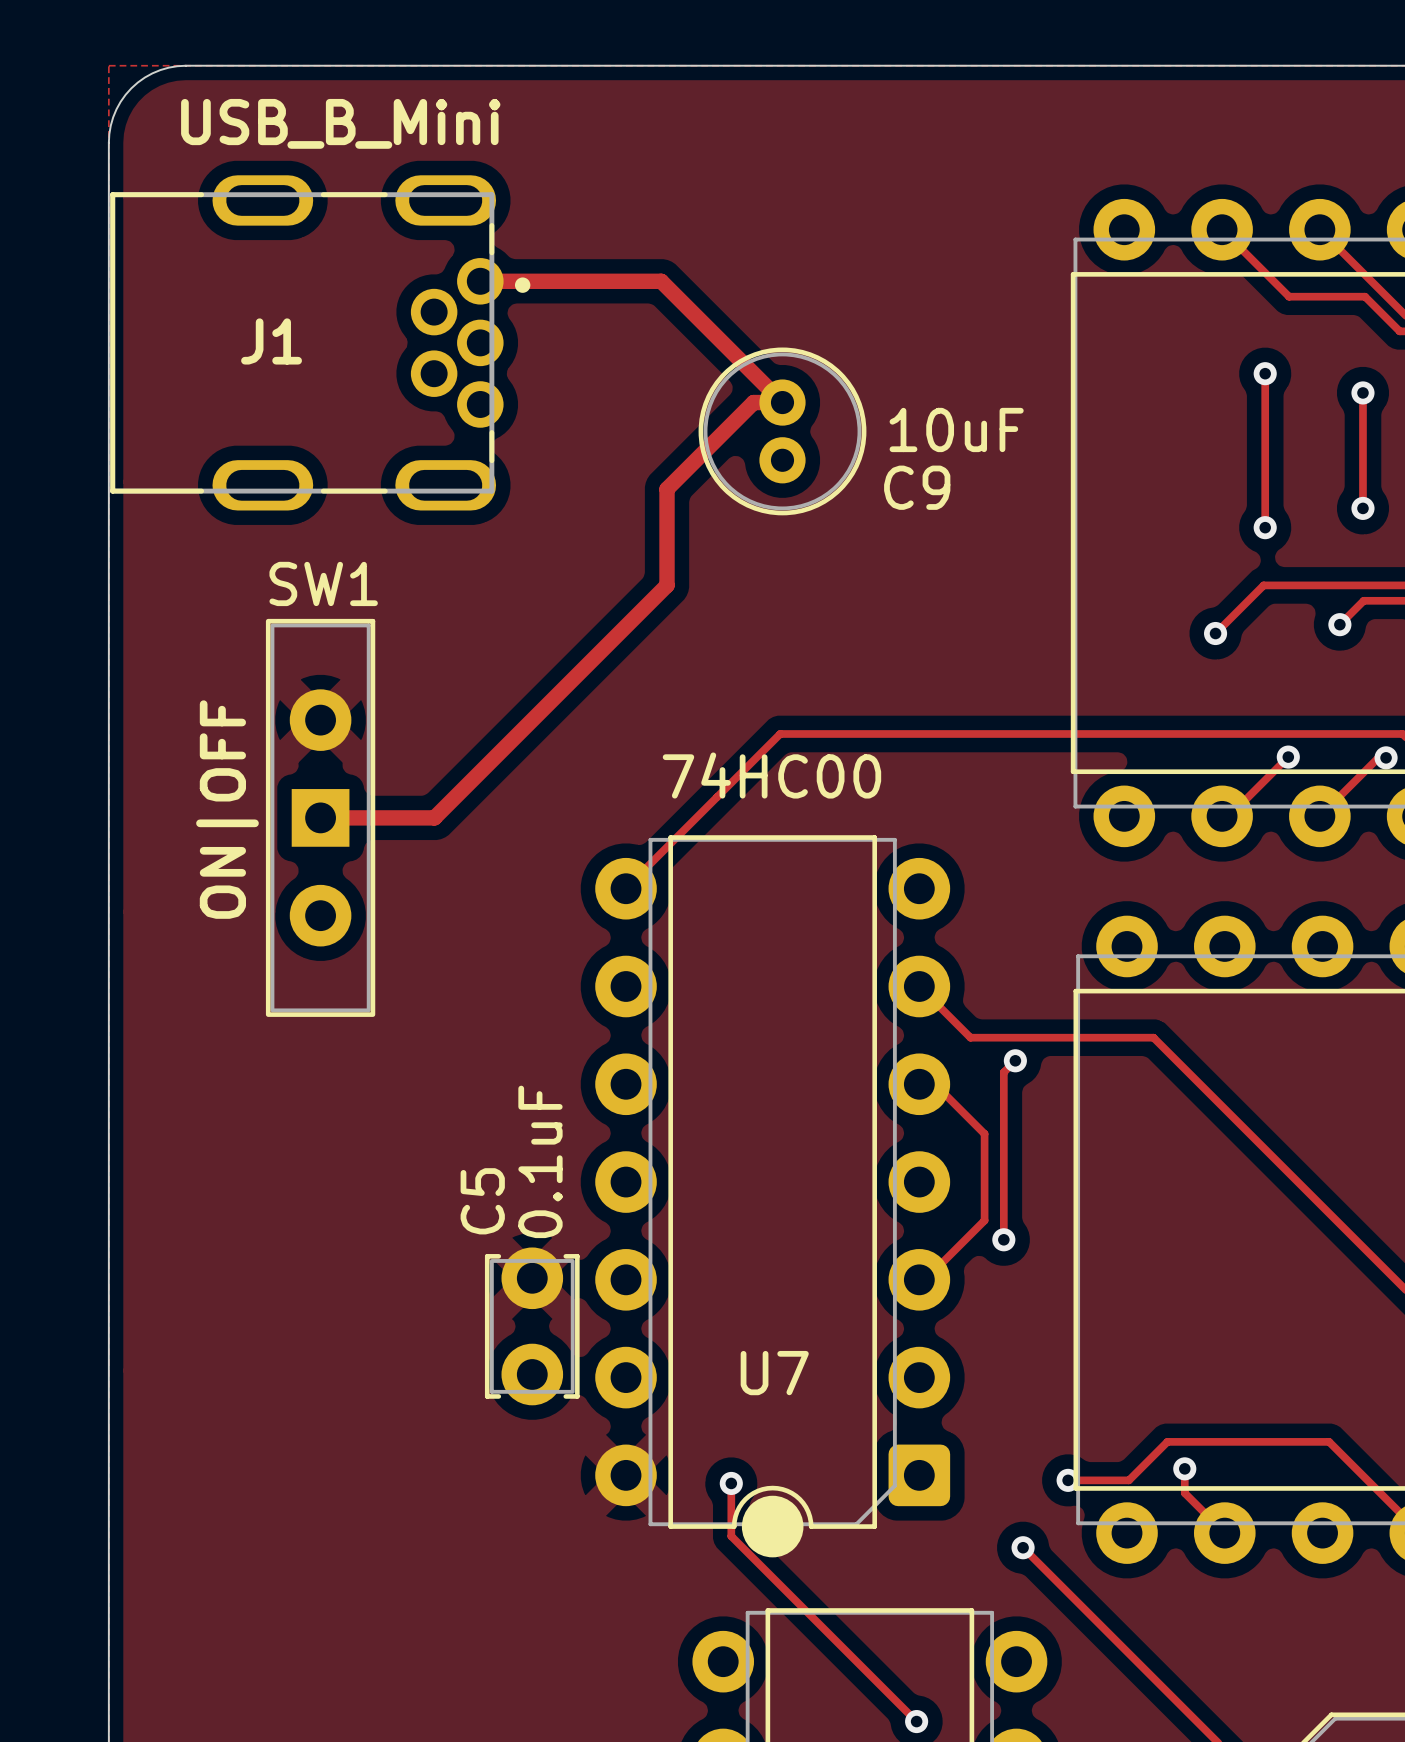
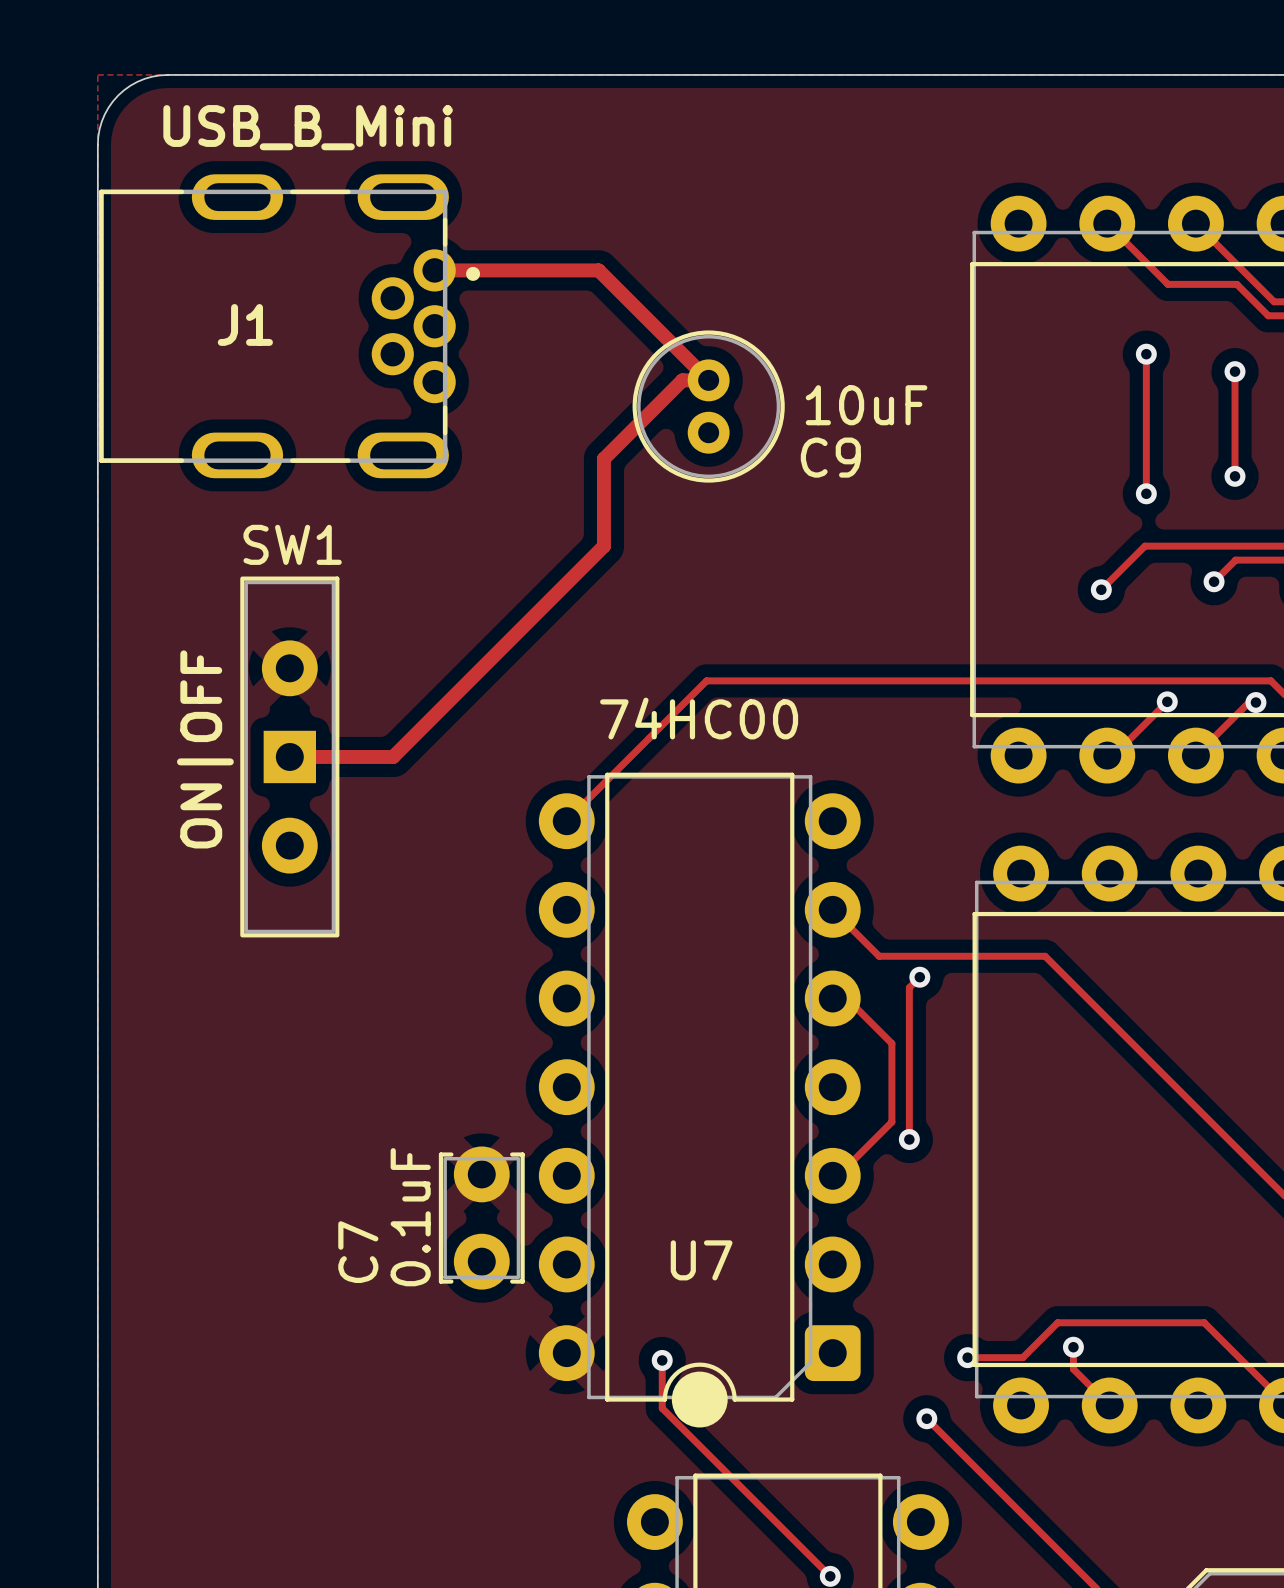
C5 value position: 0.1uF (540, 1161) -> 0.1uF (410, 1217)
C5 name: C5 (482, 1201) -> C7 (358, 1252)

